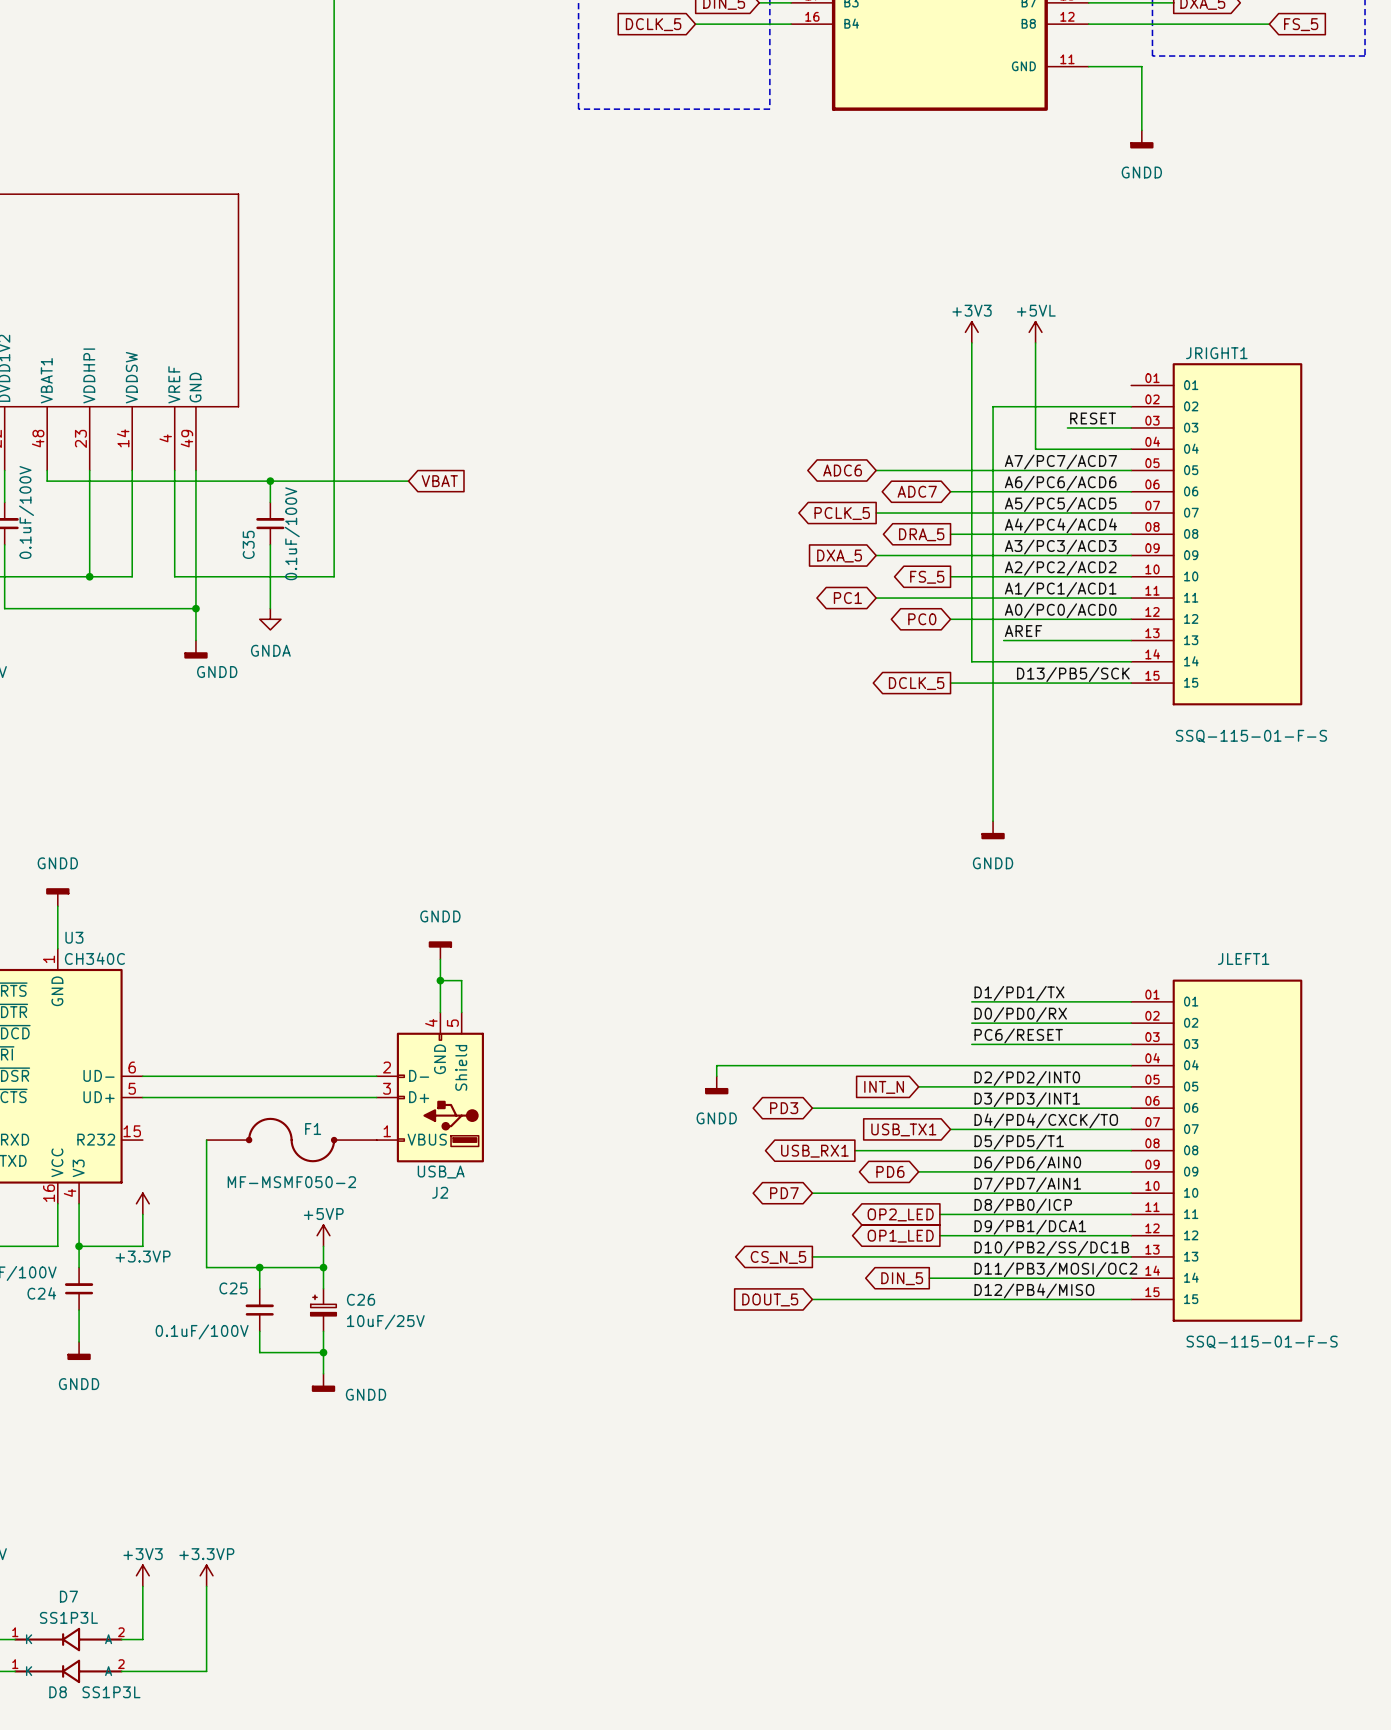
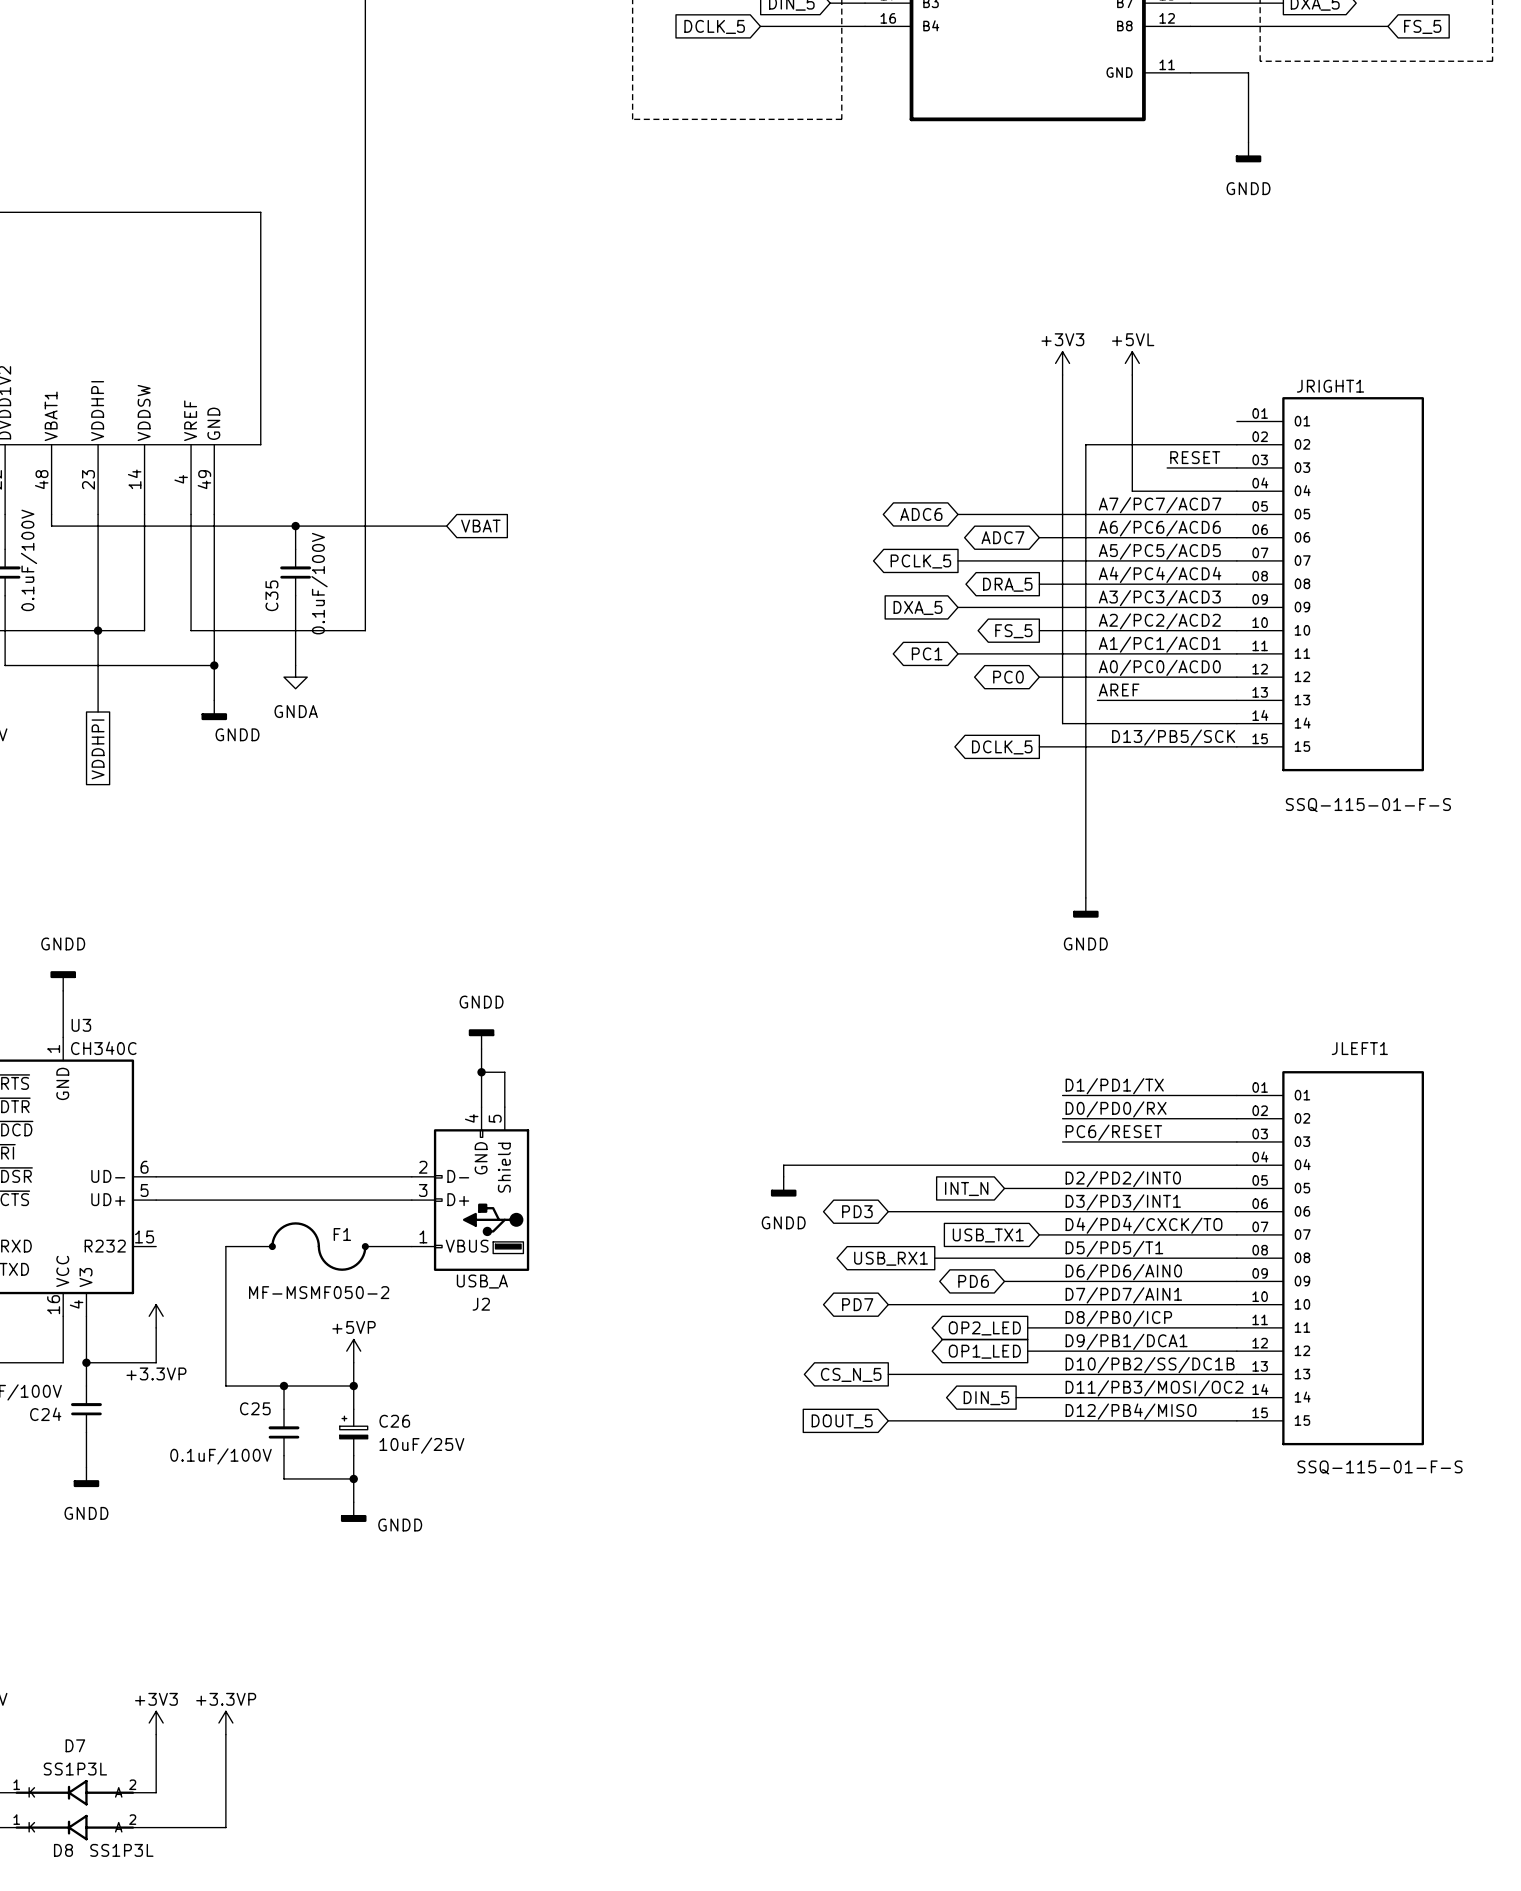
wire: none -> (98, 630) (98, 712)
global label: none -> VDDHPI (98, 749)

